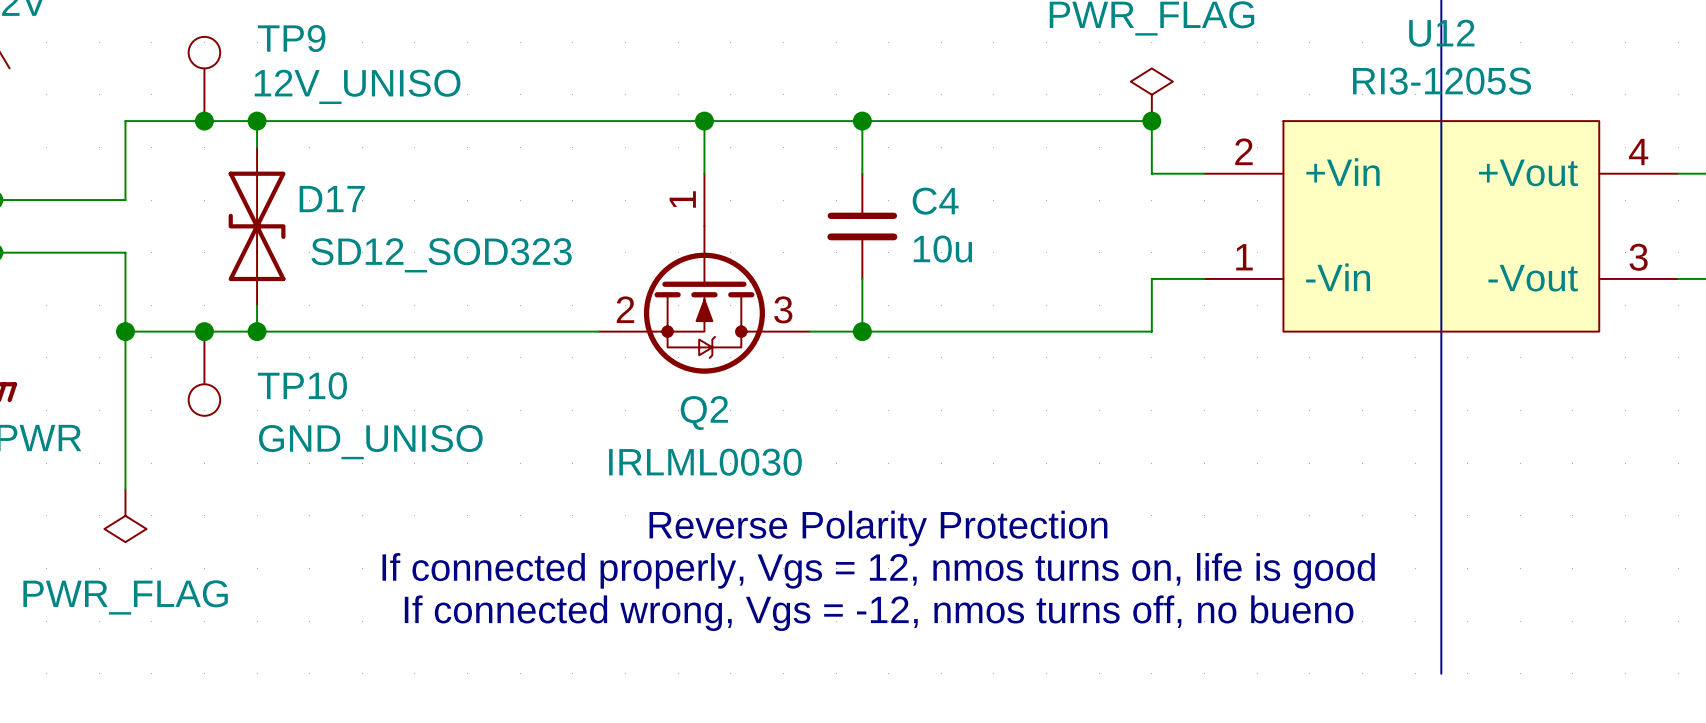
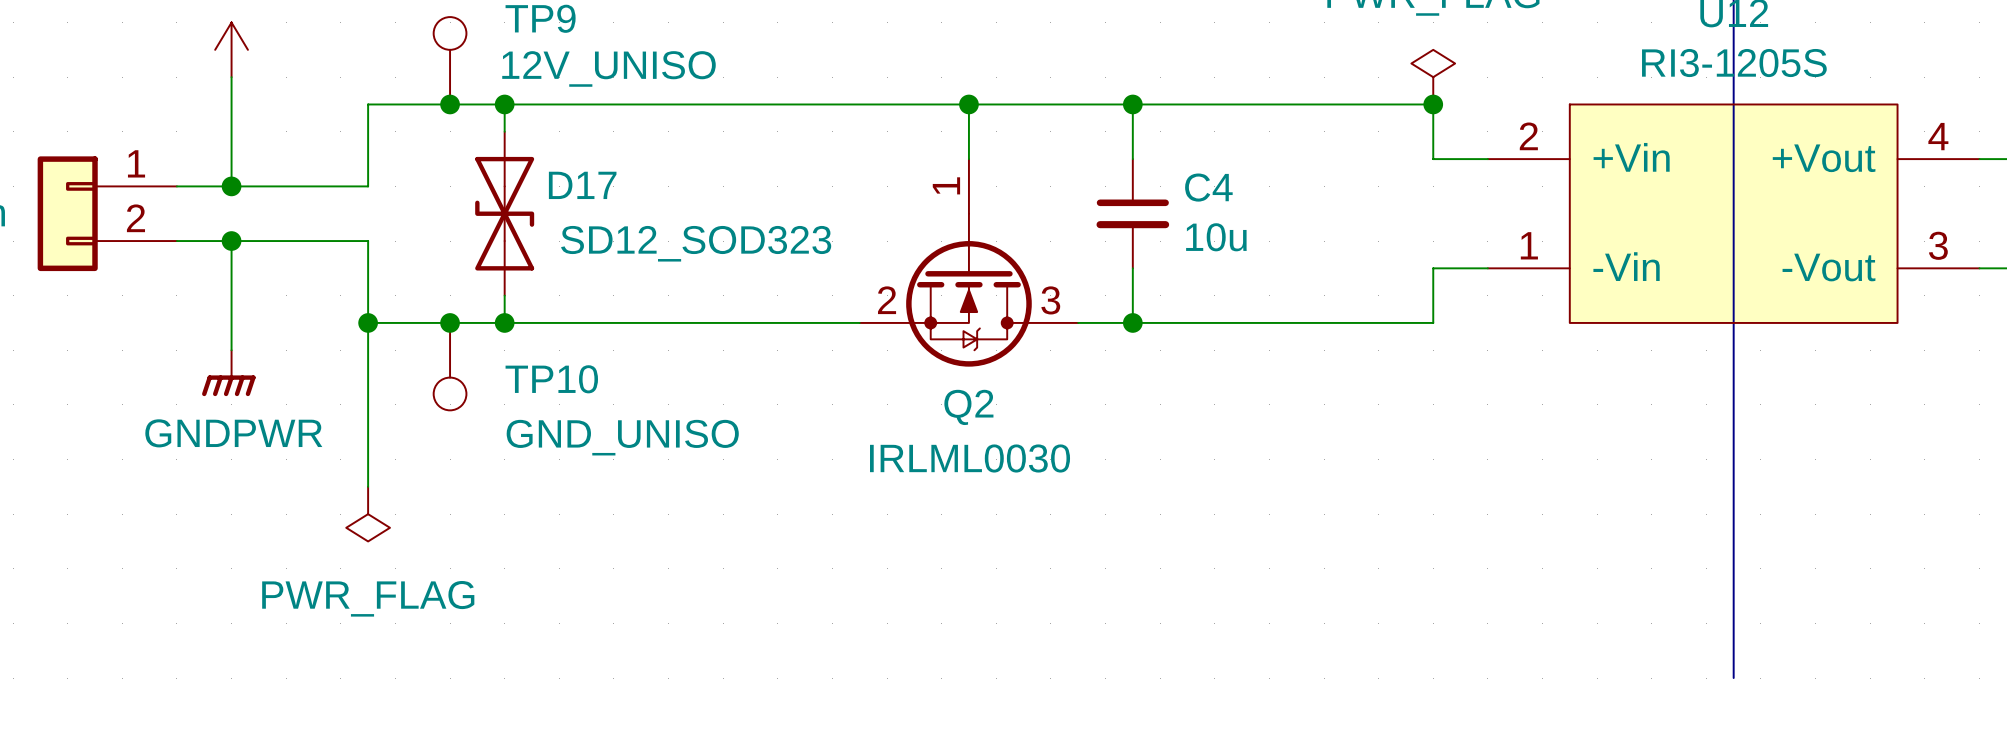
text: Reverse Polarity Protection (878, 528) -> none
text: If connected properly, Vgs = 12, nmos turns on, life is good (878, 570) -> none
text: If connected wrong, Vgs = -12, nmos turns off, no bueno (879, 613) -> none

